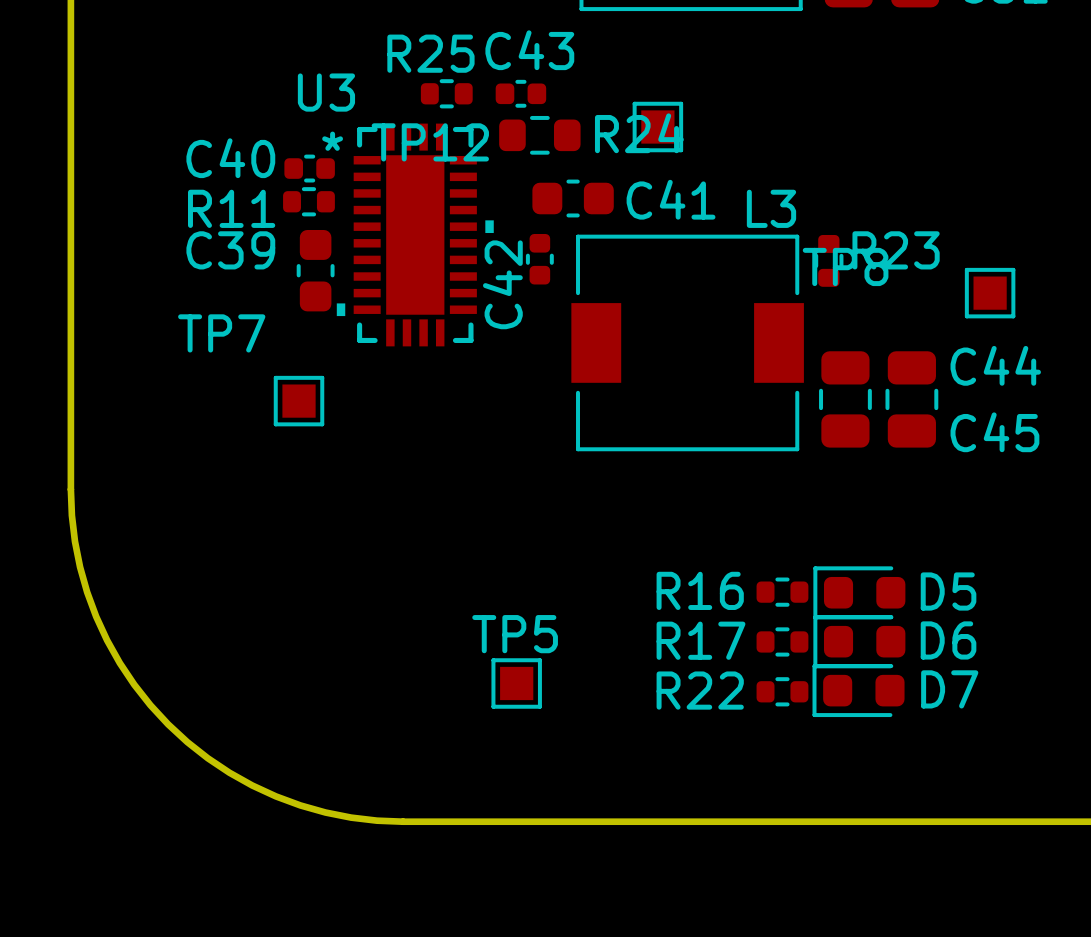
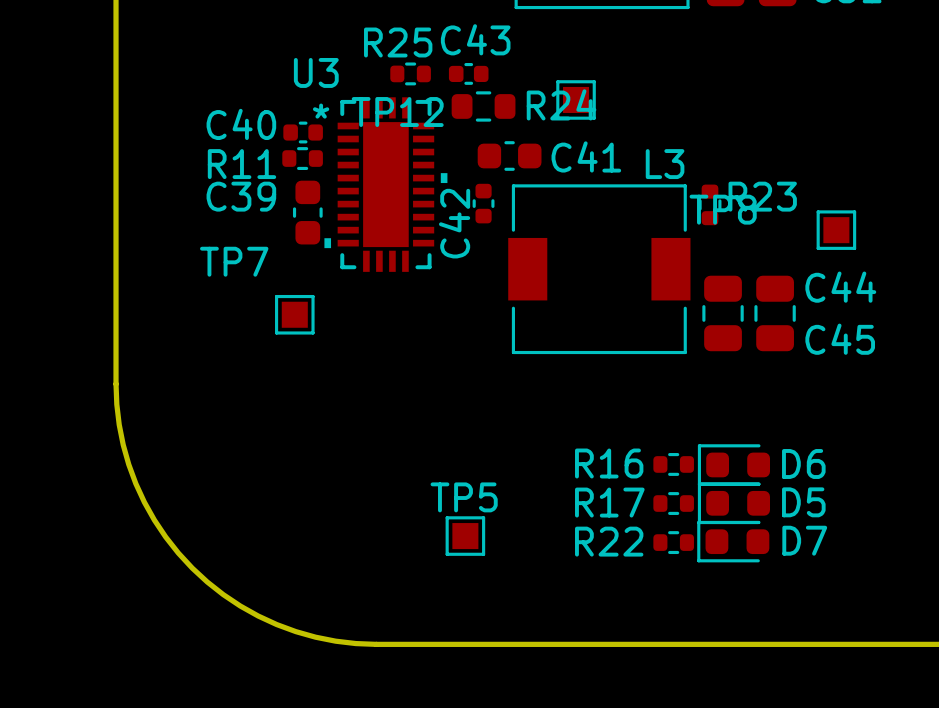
D5 name: D5 (948, 591) -> D6 (803, 463)
D6 name: D6 (948, 640) -> D5 (803, 502)

